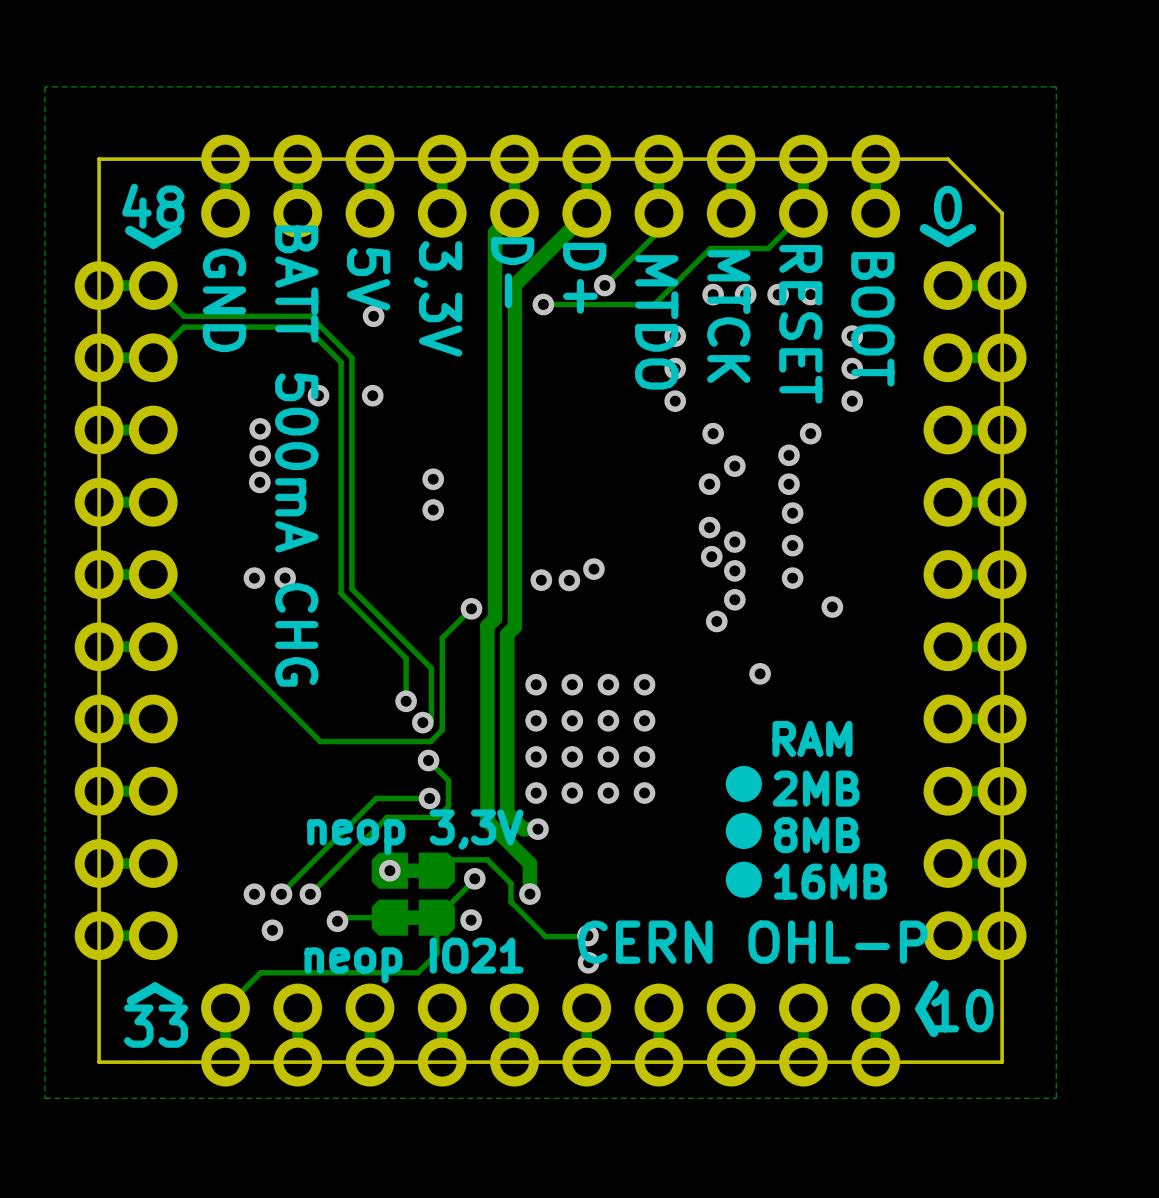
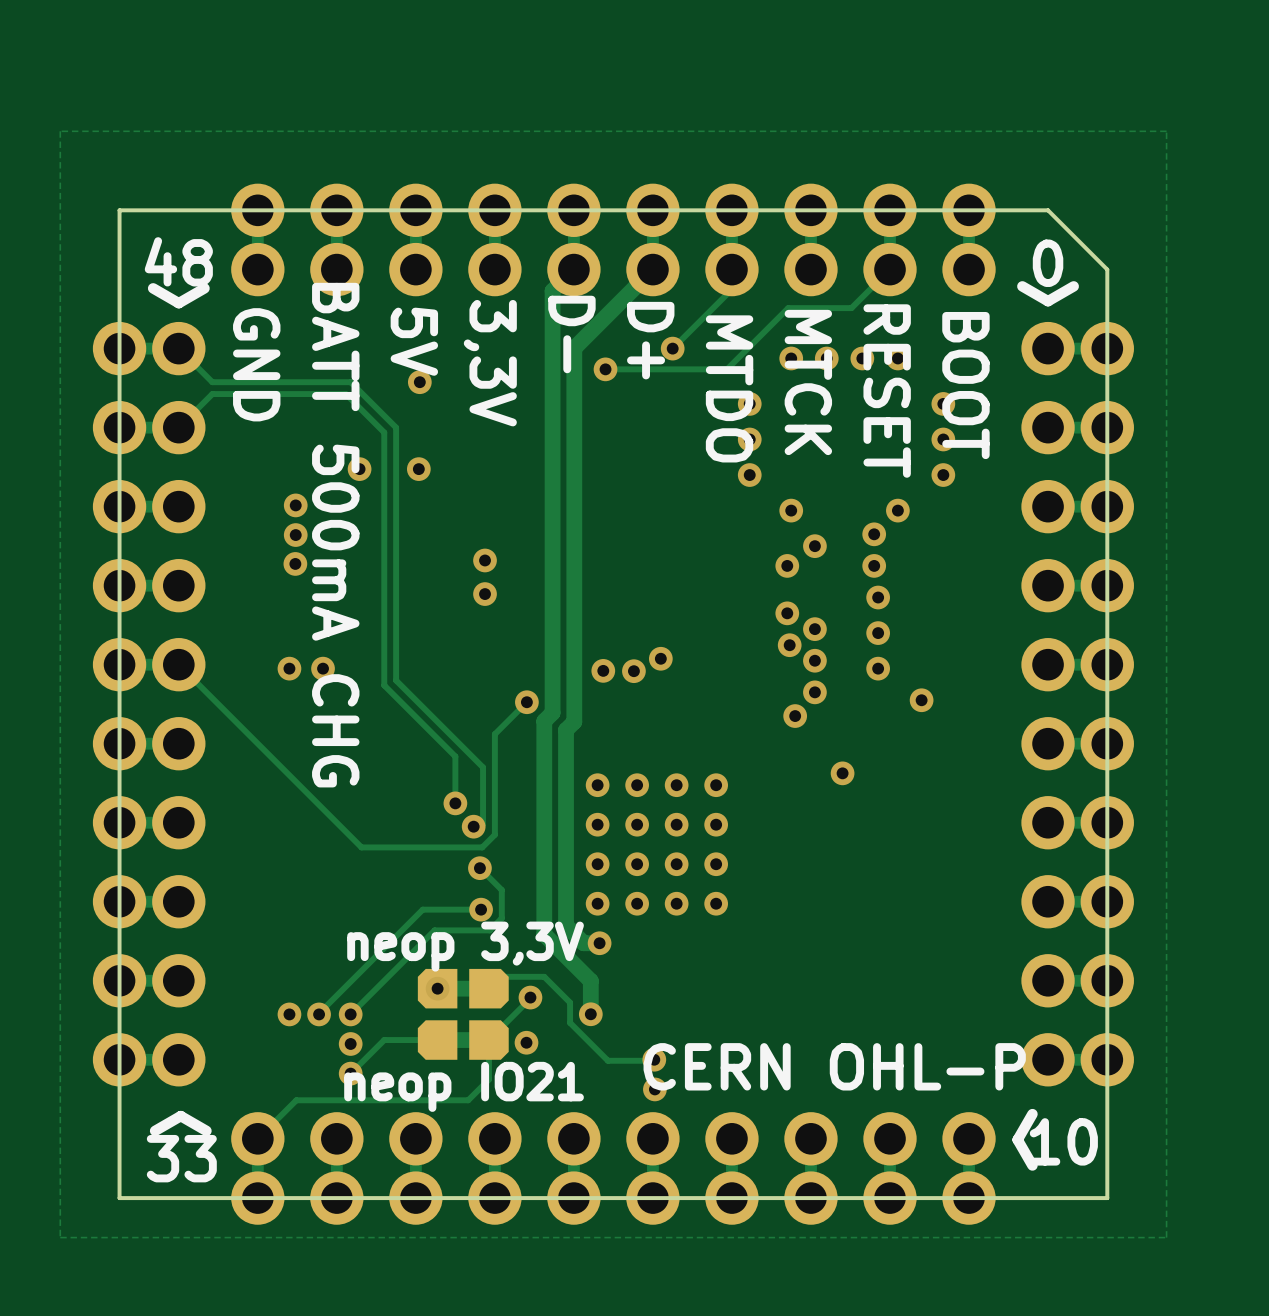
text: RAM (812, 738) -> none
drawing: [725, 765, 762, 898] -> none
text: 2MB (816, 788) -> none
text: 8MB (816, 835) -> none
text: 16MB (830, 881) -> none
via: none -> (350, 1043)
track: none -> (380, 1043) (350, 1073)
via: (337, 921) -> none
via: (272, 930) -> none
via: none -> (350, 1073)

